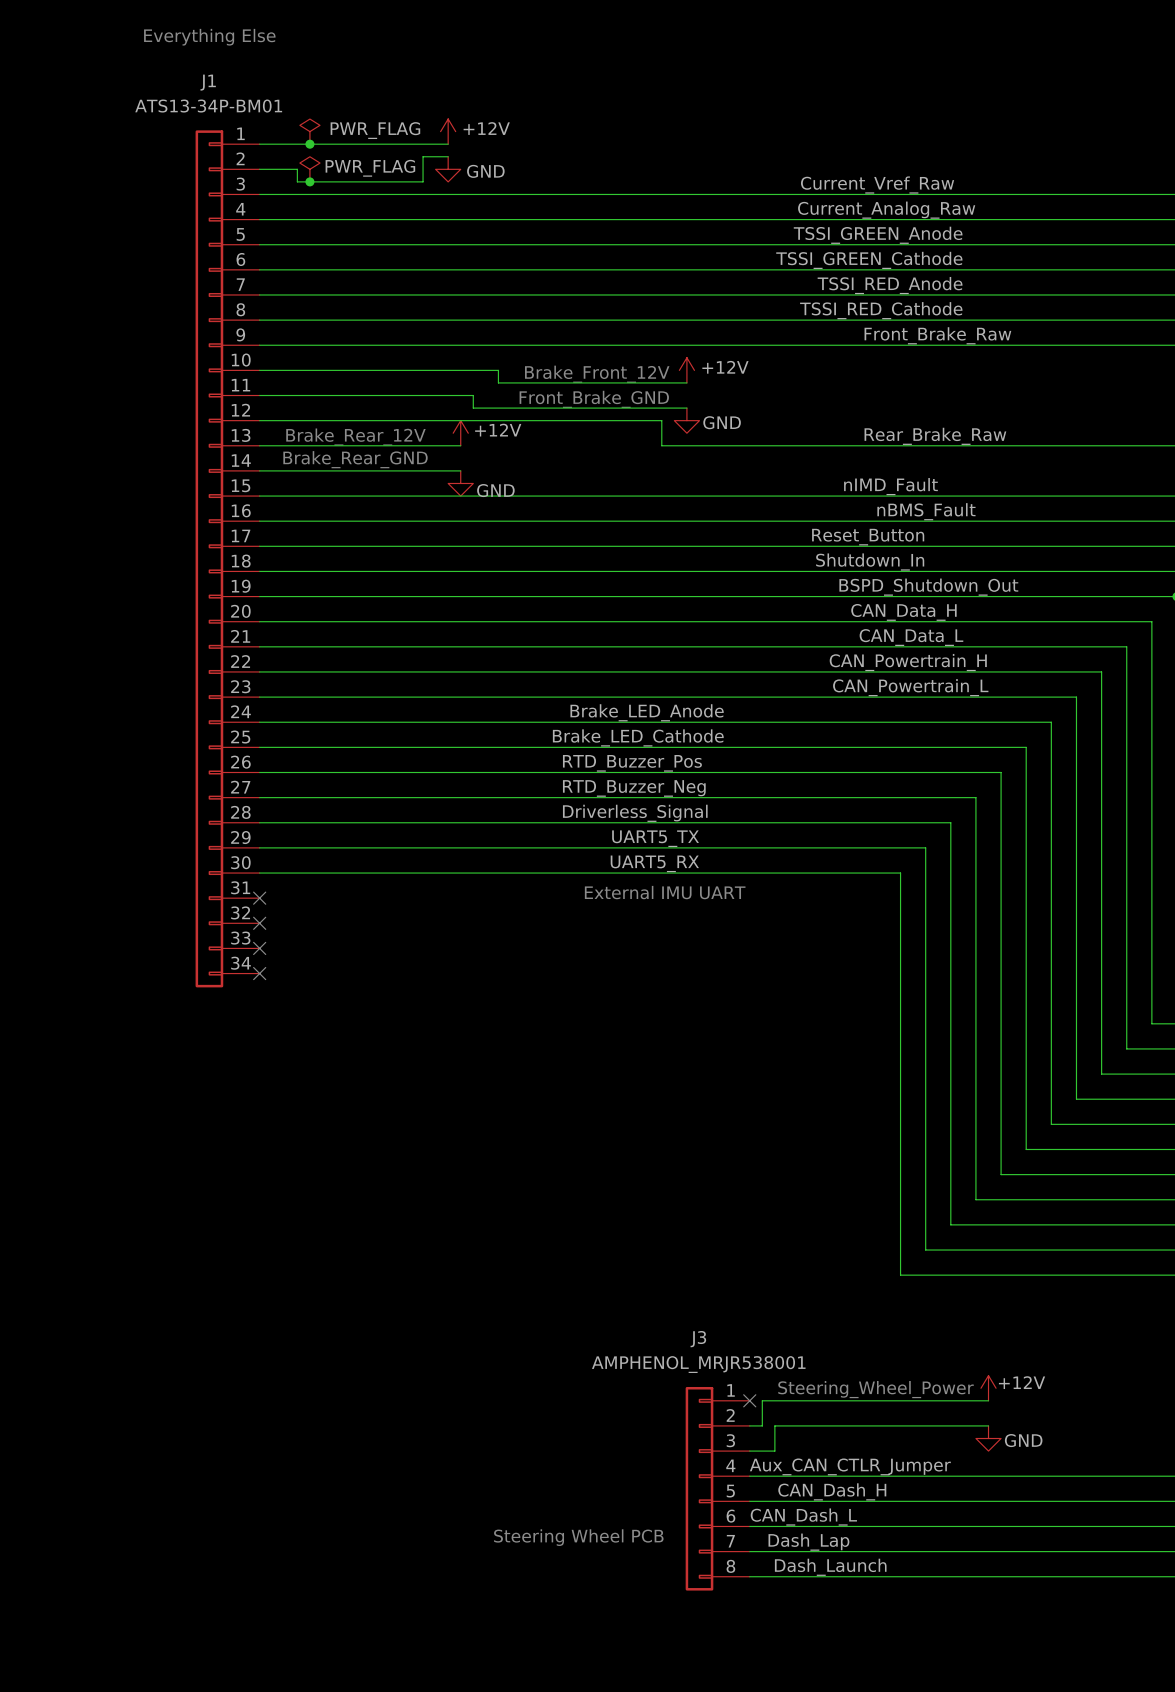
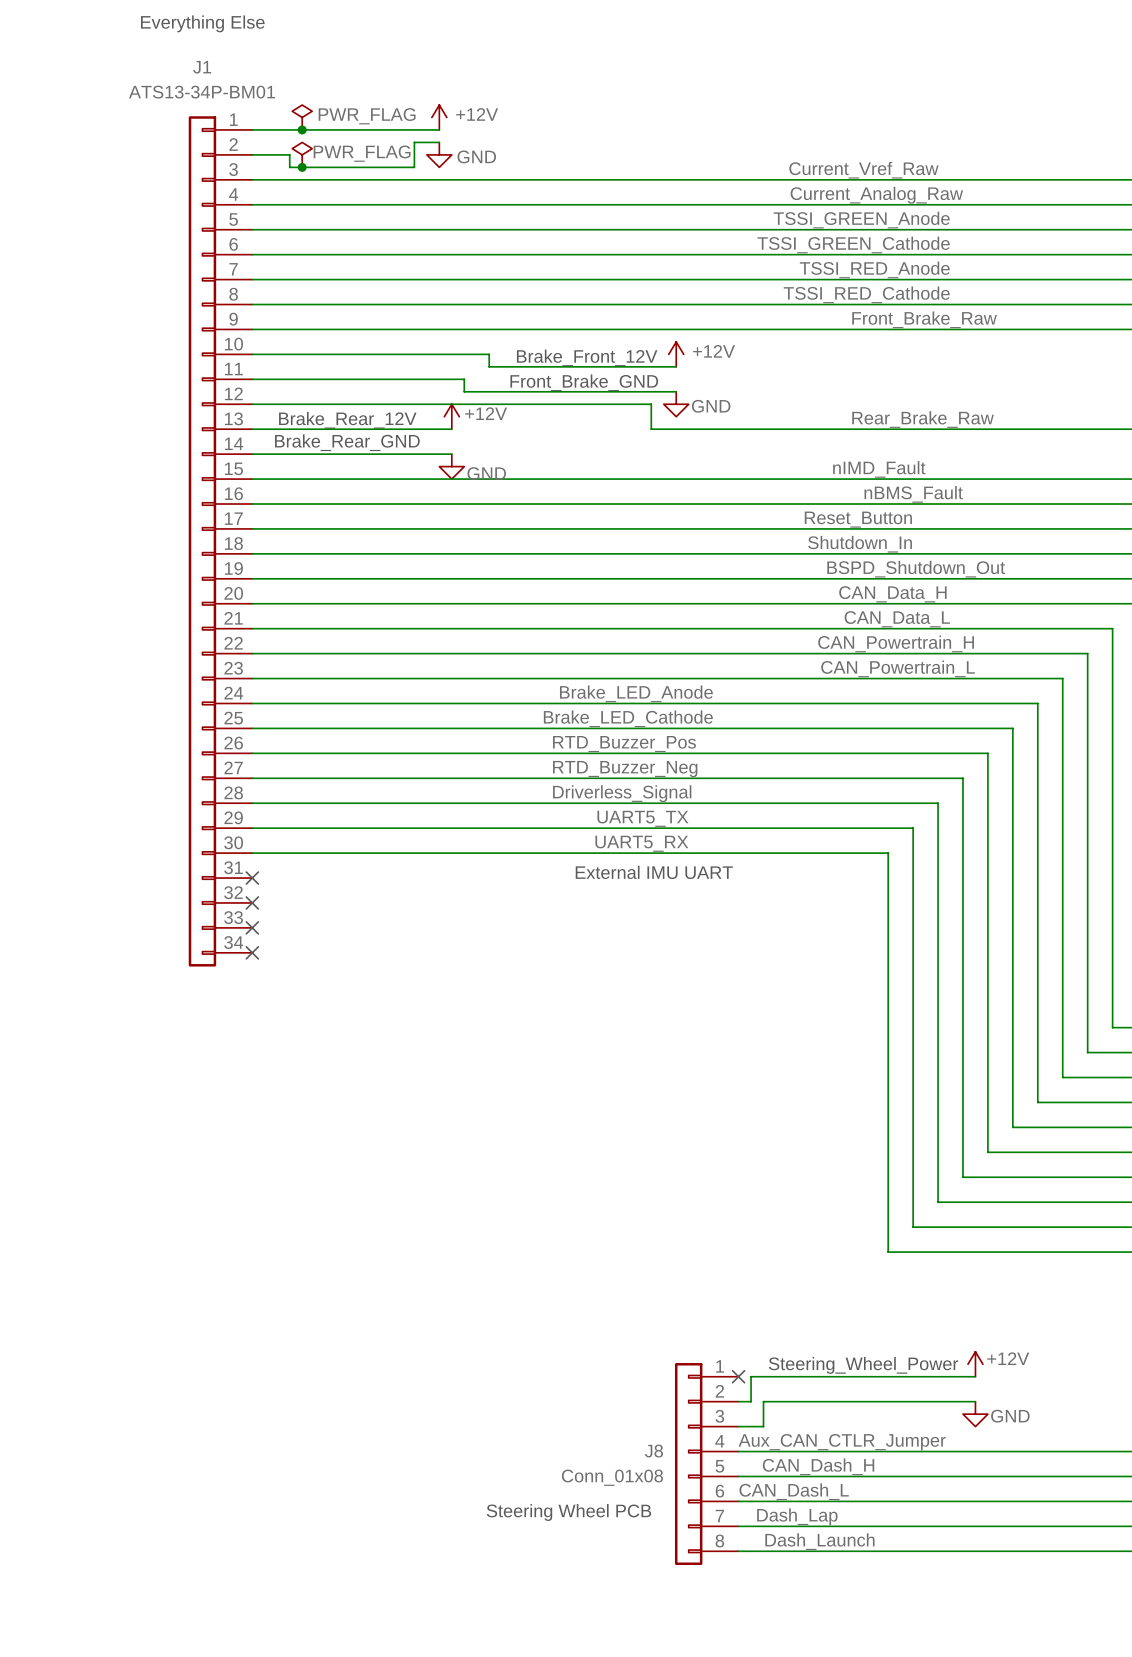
J3 name: J3 (698, 1339) -> J8 (653, 1451)
J3 value: AMPHENOL_MRJR538001 (698, 1364) -> Conn_01x08 (612, 1477)

